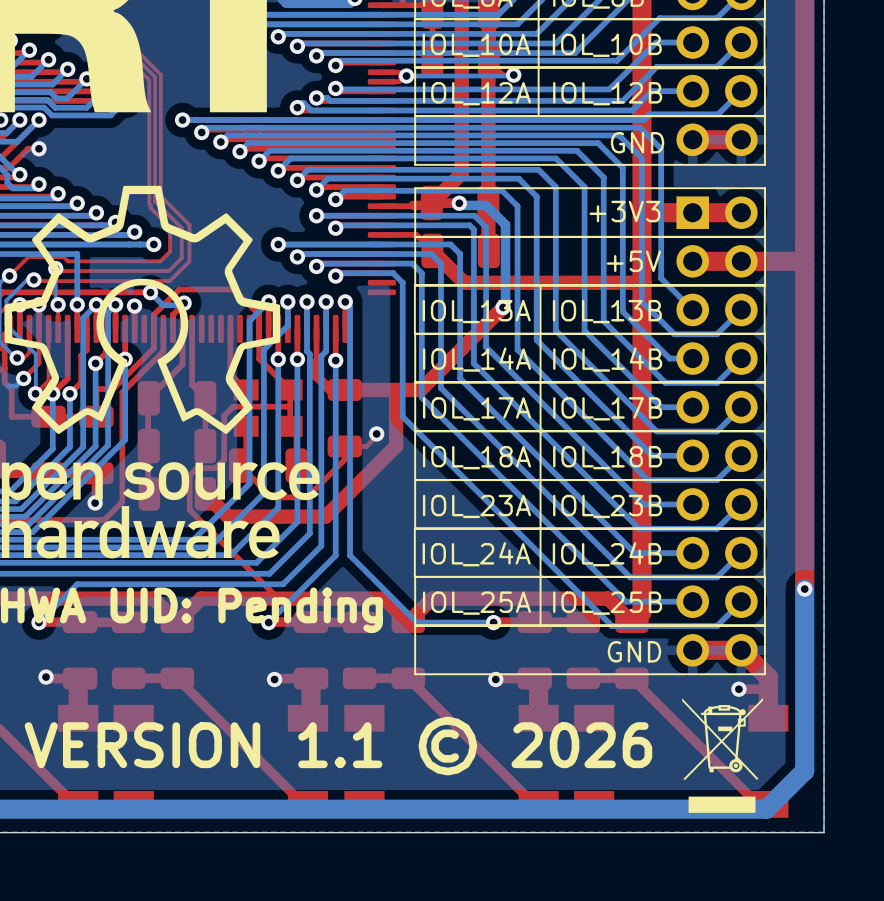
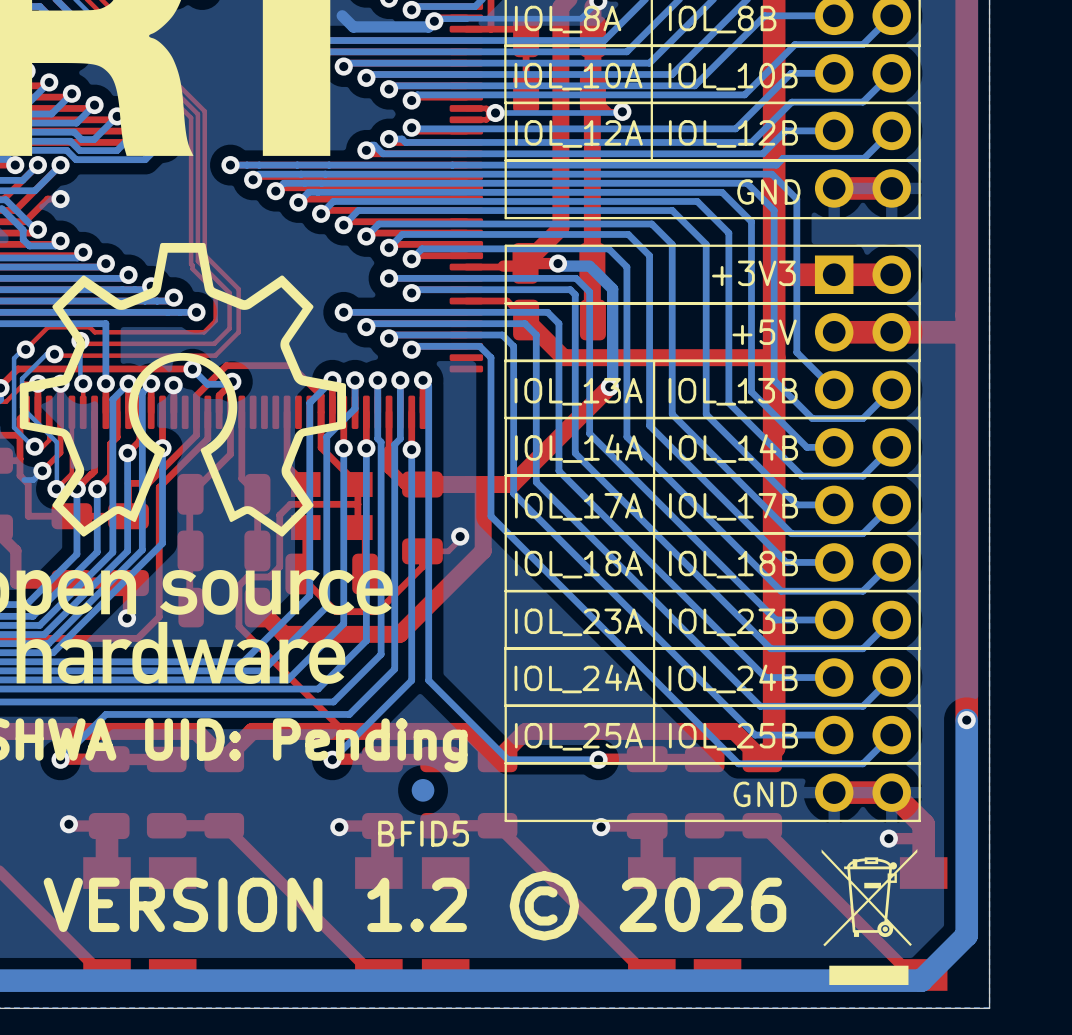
BFID5: none -> (423, 790)
text: VERSION 1.1 © 2026 (338, 746) -> VERSION 1.2 © 2026 (414, 905)

